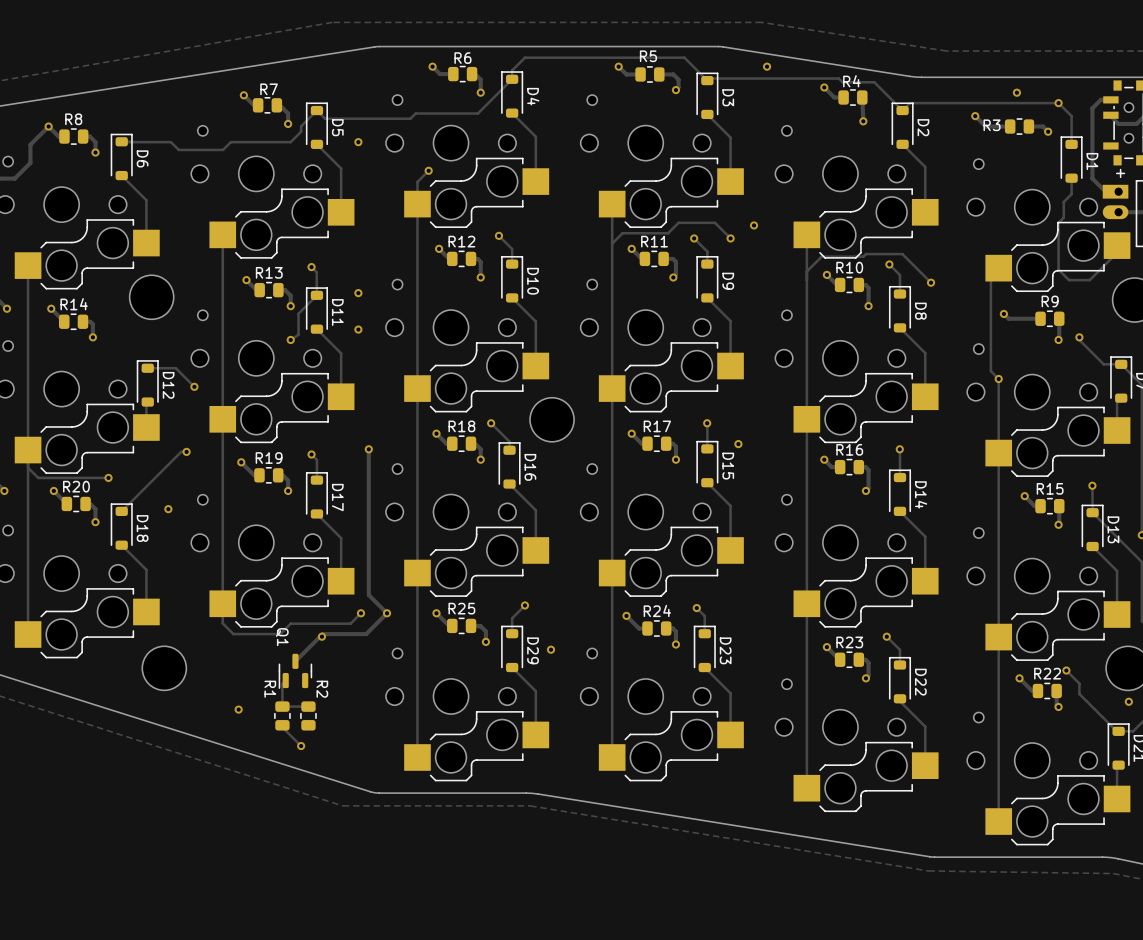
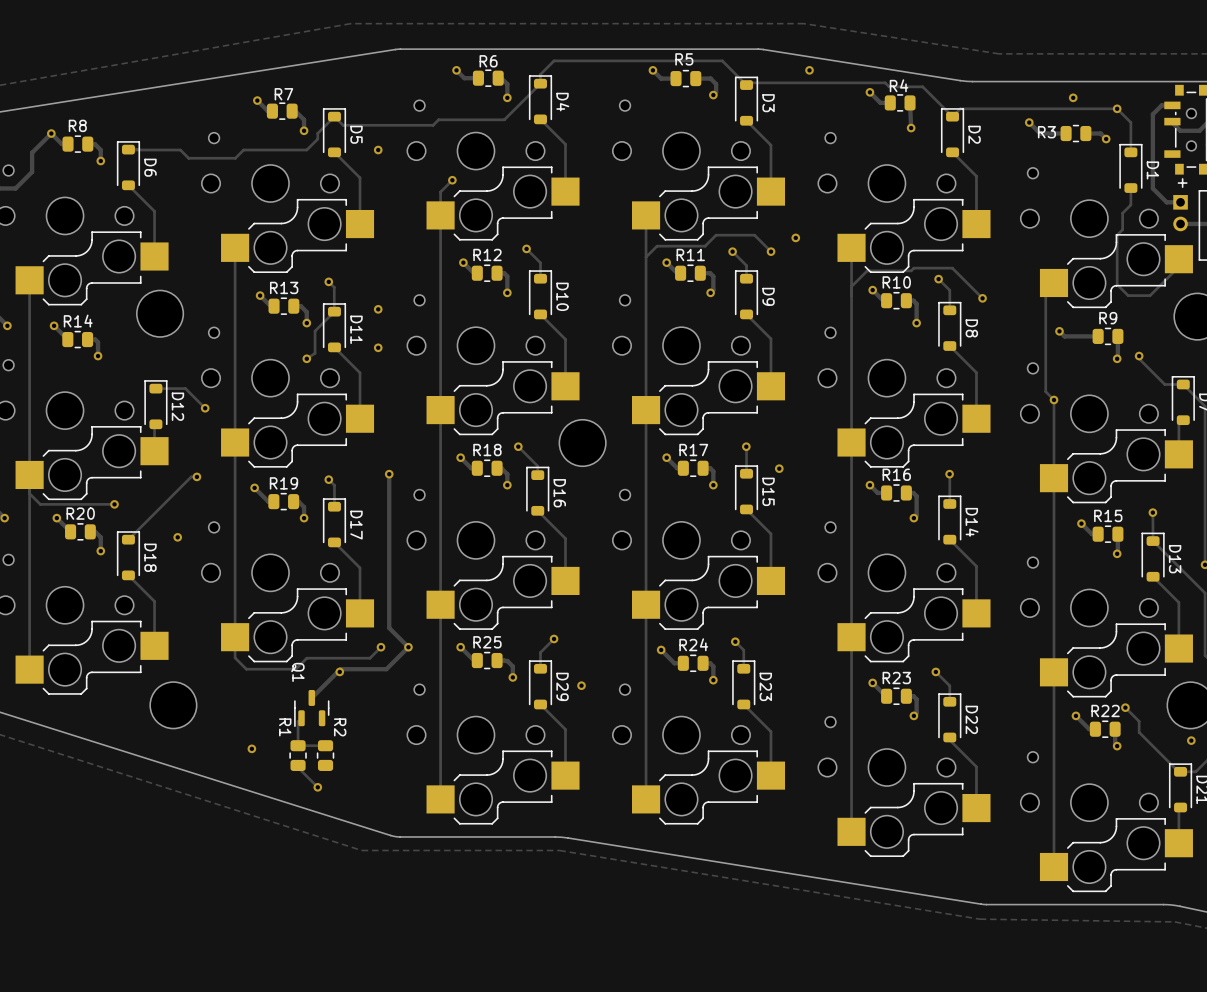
part footprint: [1102, 184, 1129, 220] -> [1173, 195, 1188, 232]

